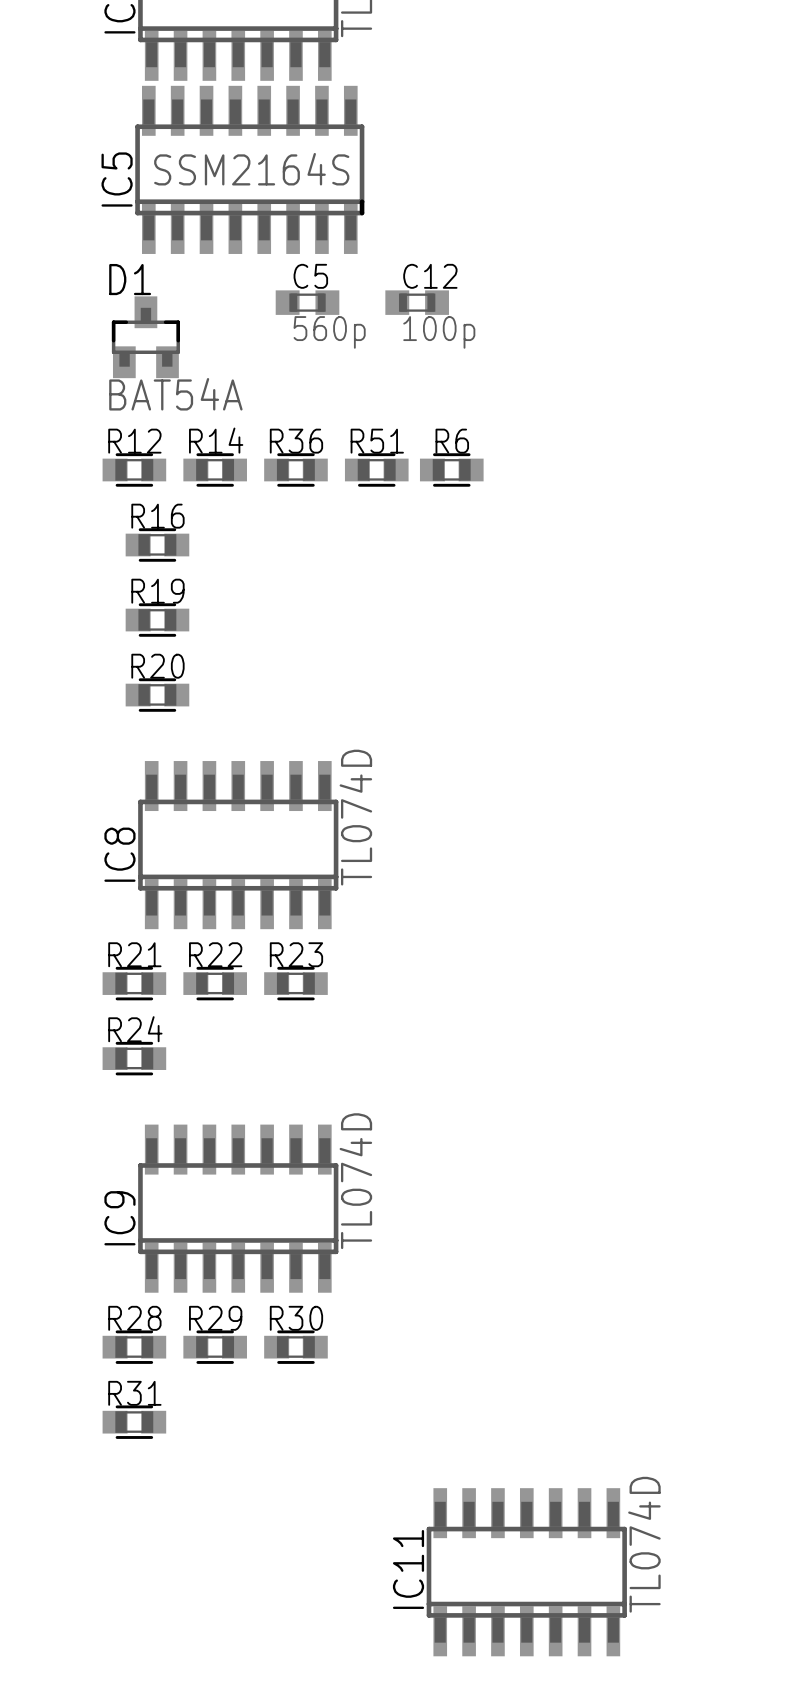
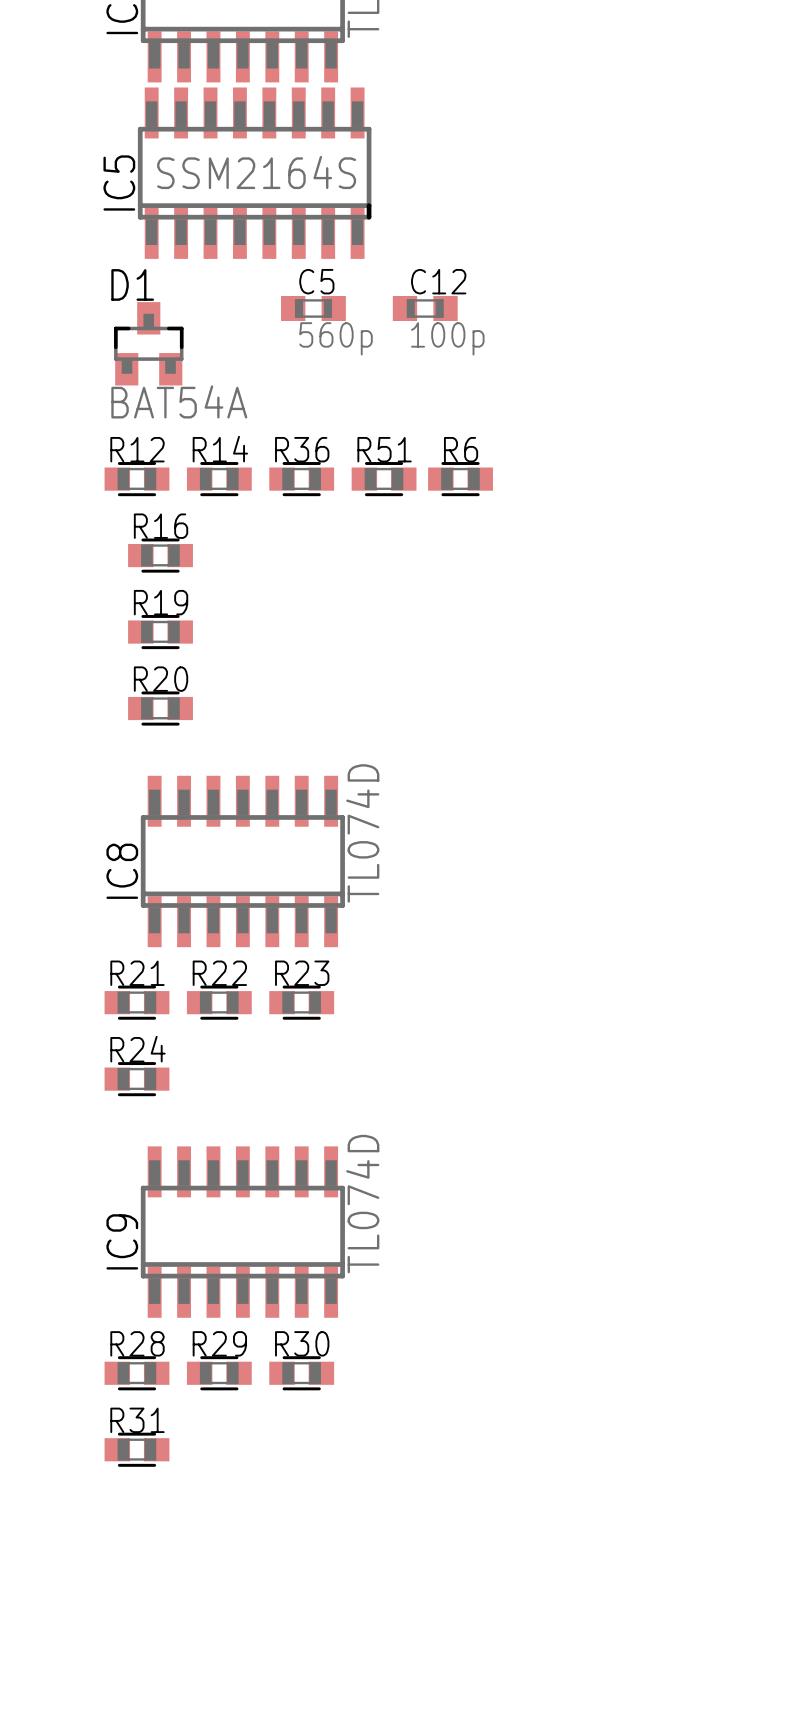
IC11: TL074D (526, 1572) -> none

